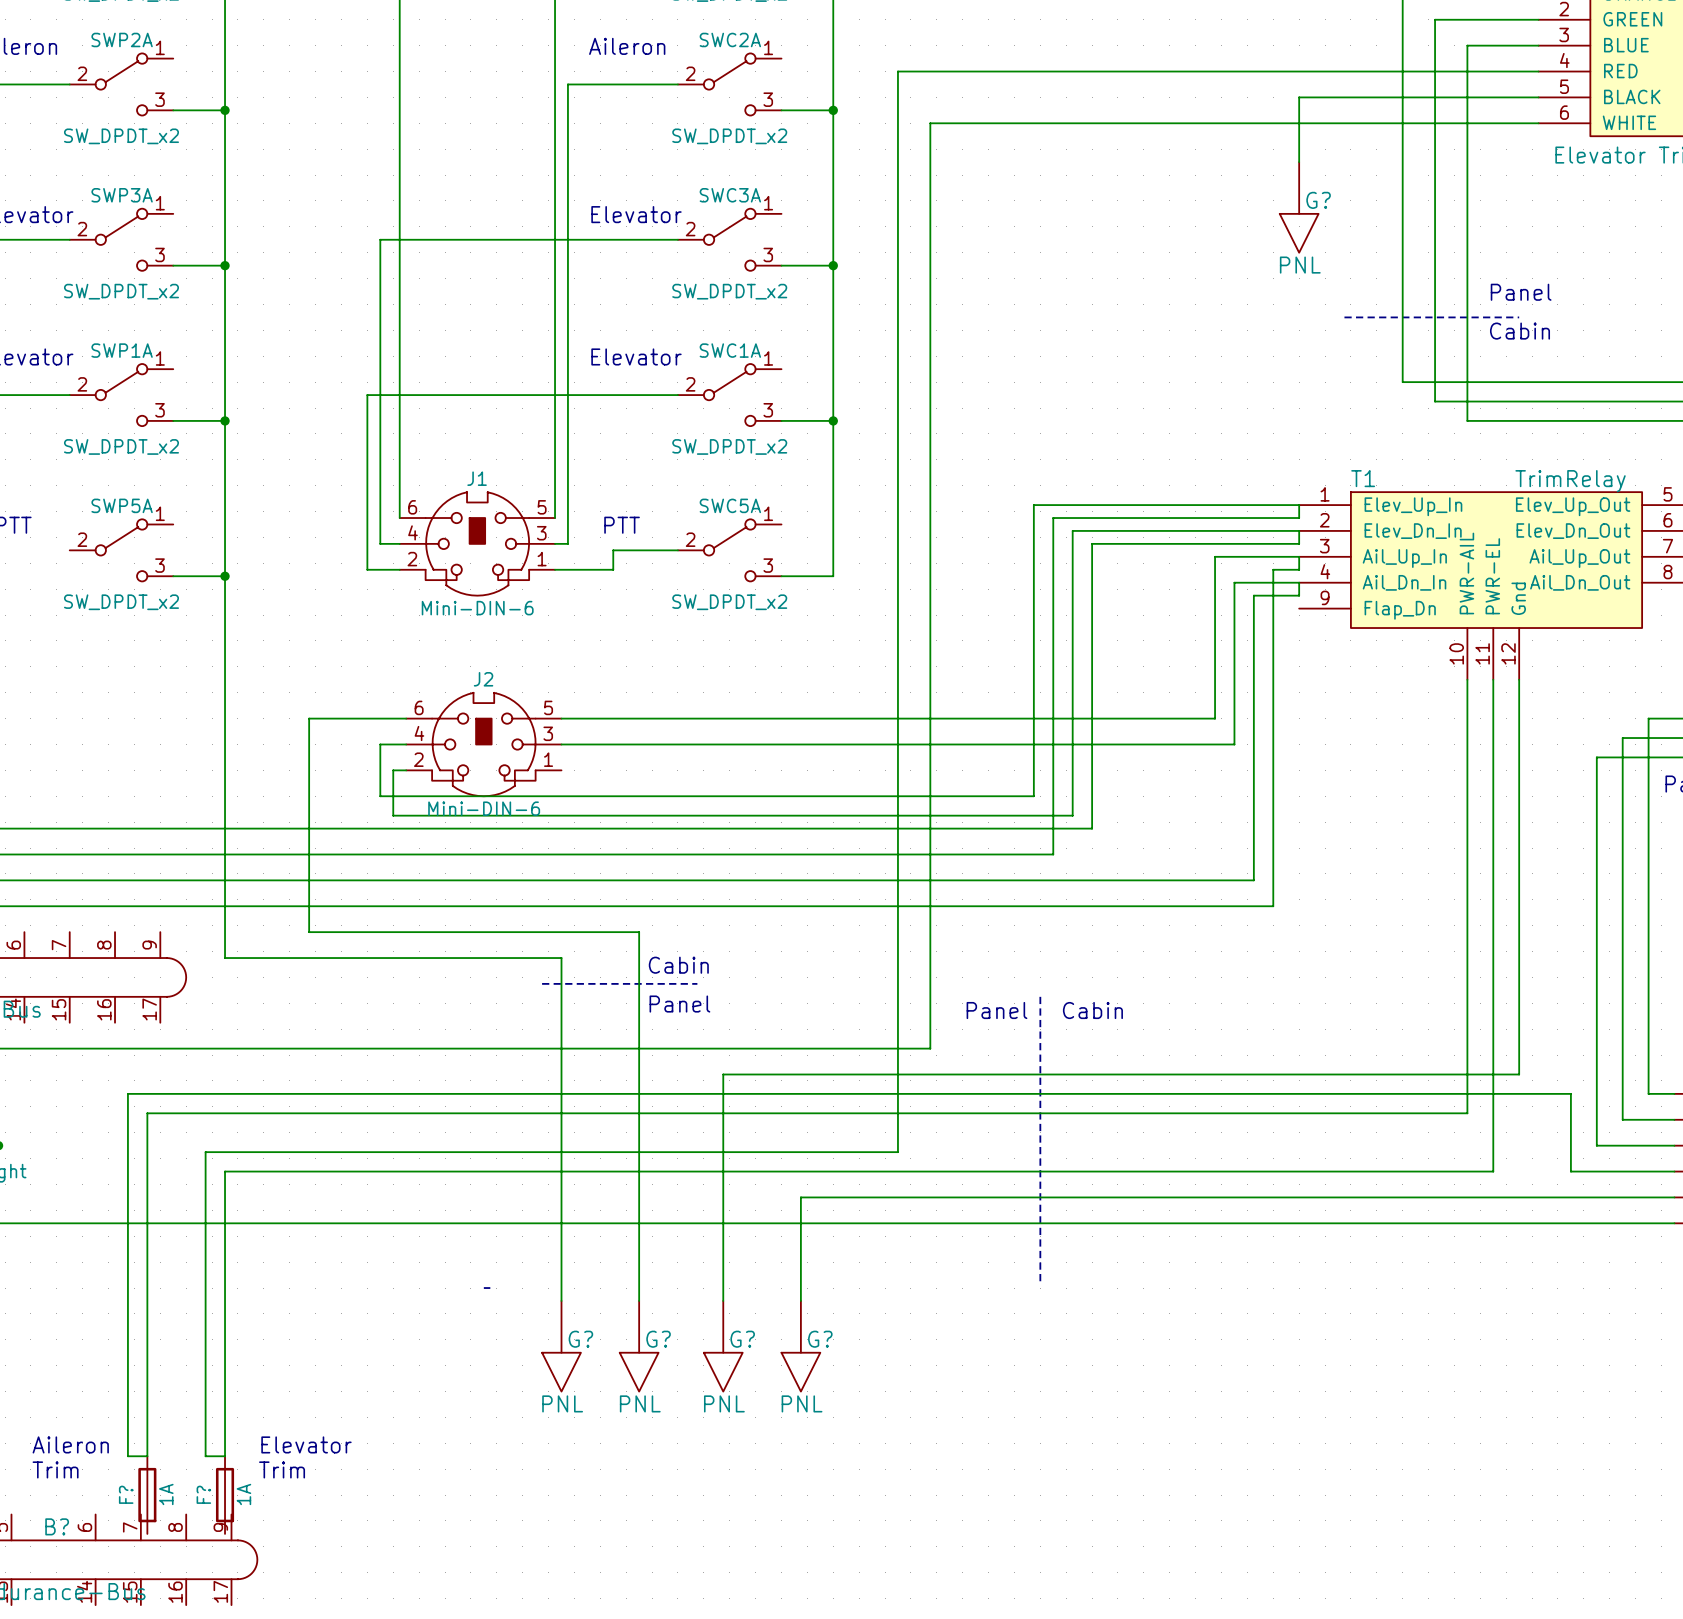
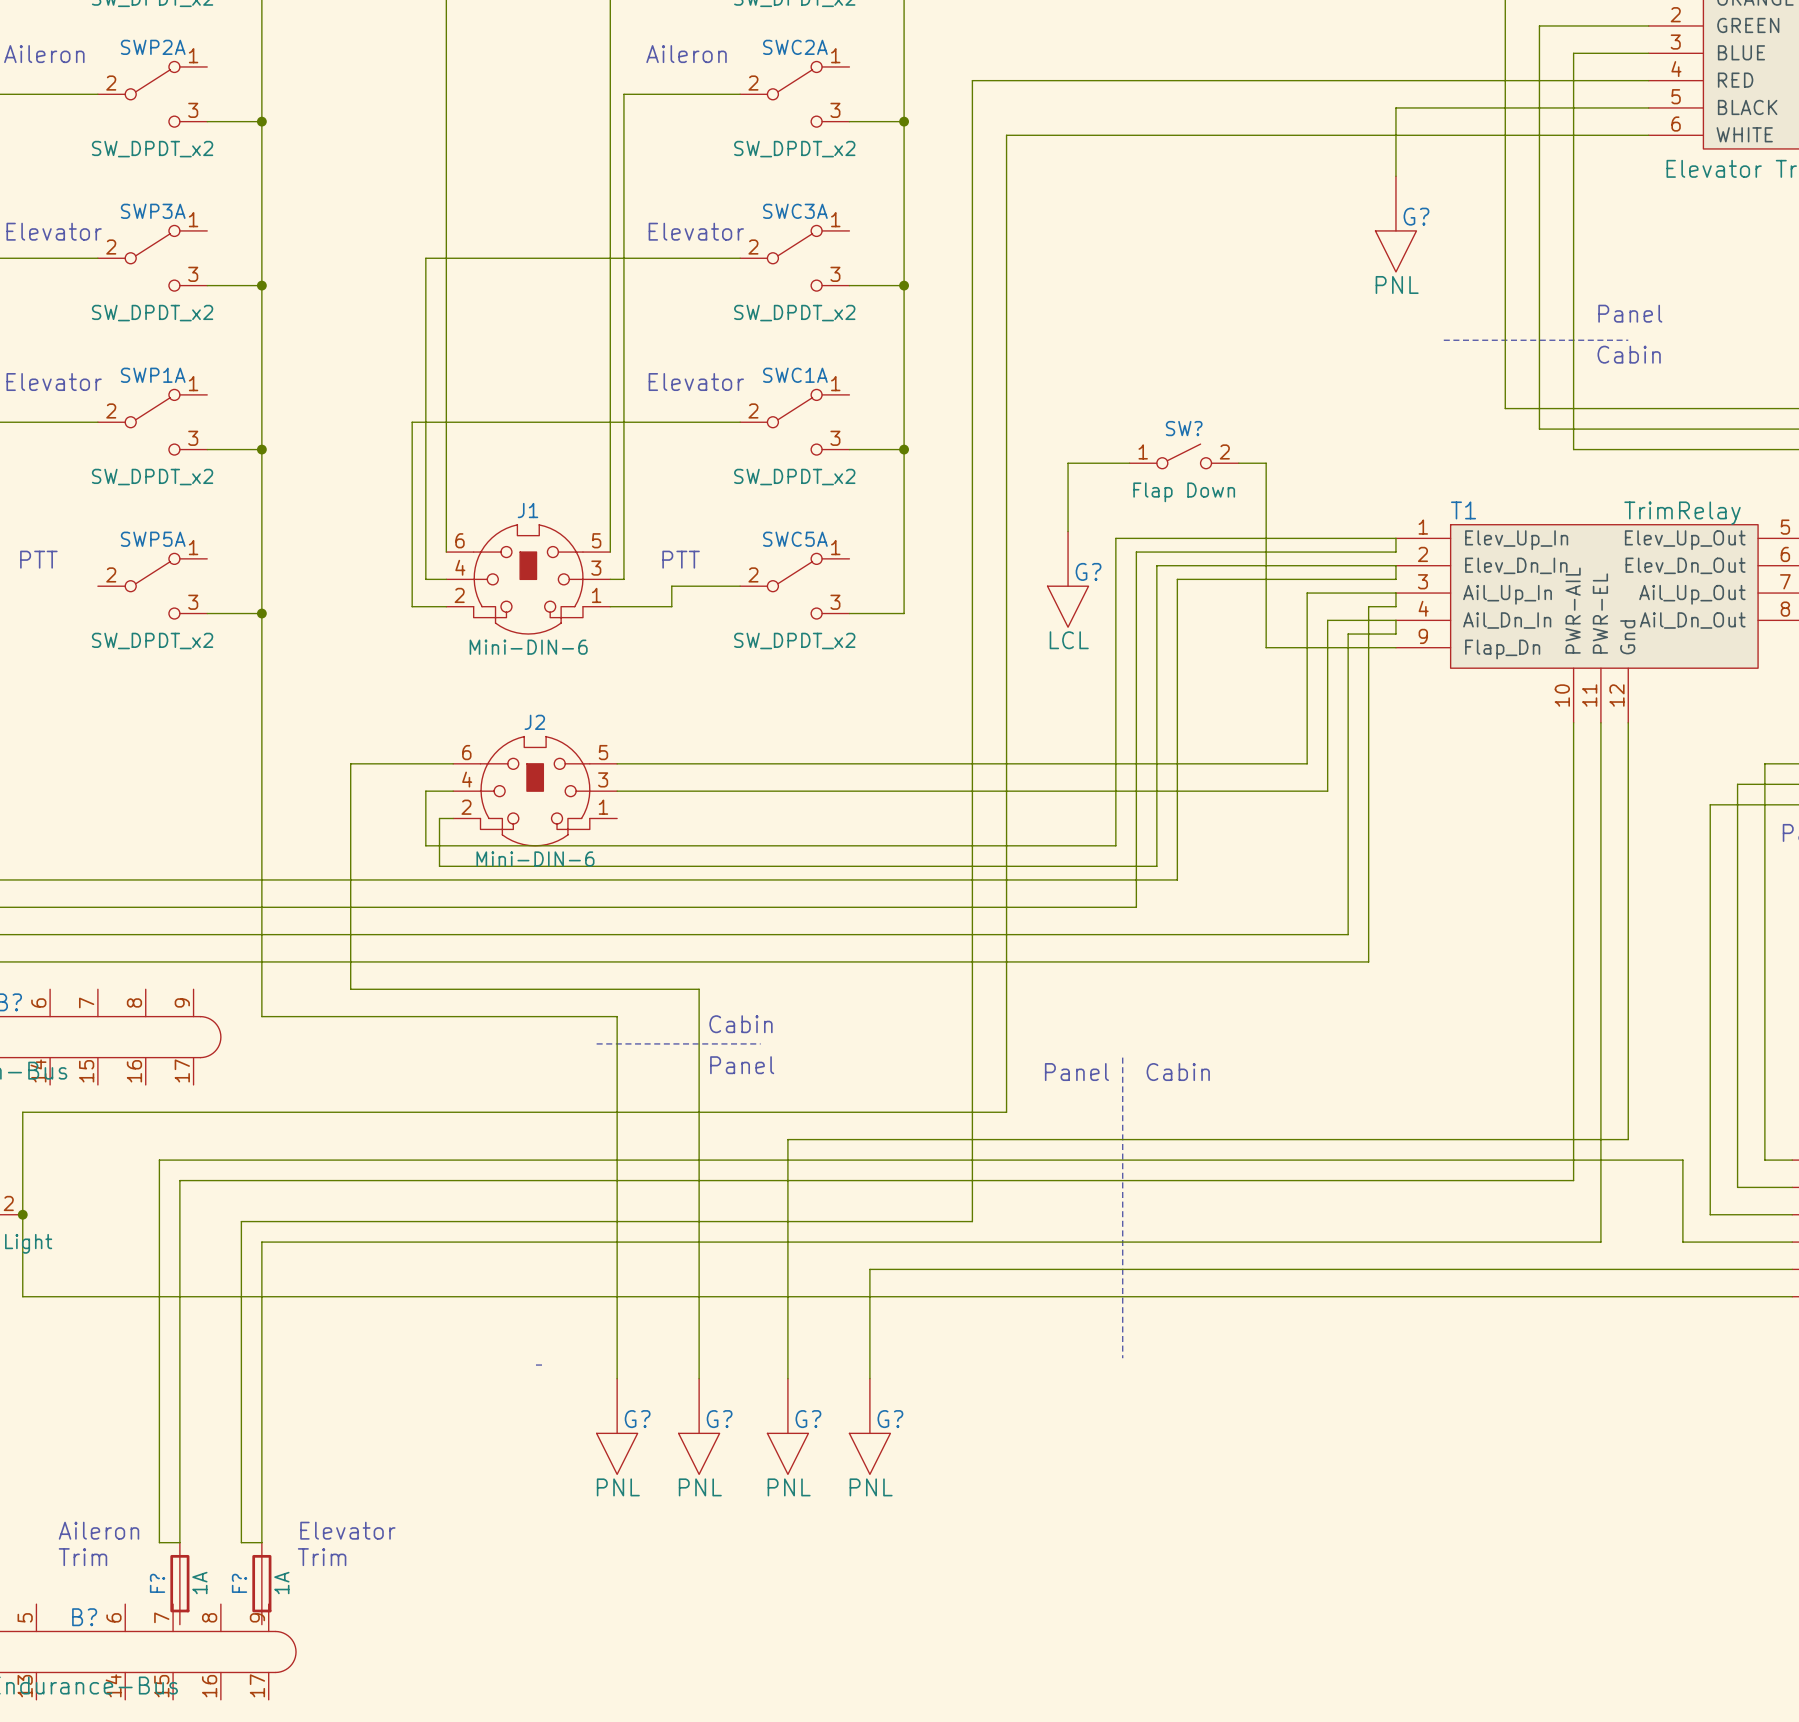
SW?: none -> Flap Down (1184, 456)
wire: none -> (1129, 463) (1068, 463) (1068, 531)
wire: none -> (1238, 463) (1266, 463) (1266, 647) (1395, 647)
G?: none -> LCL (1068, 579)

